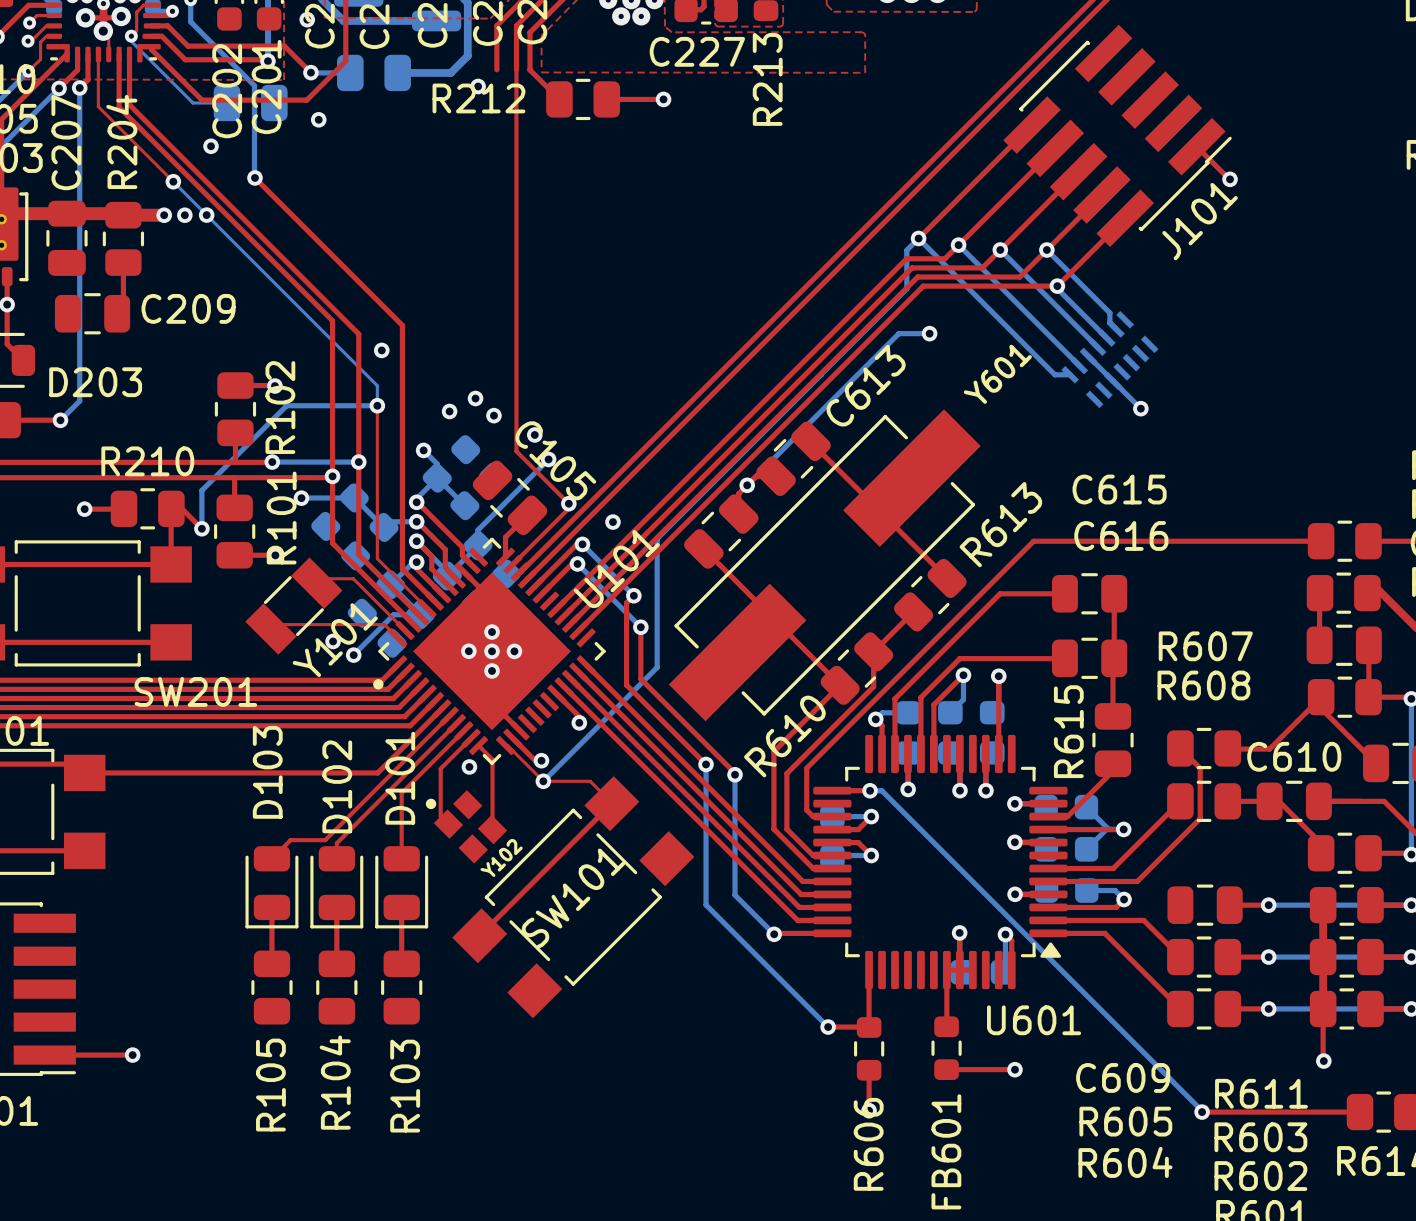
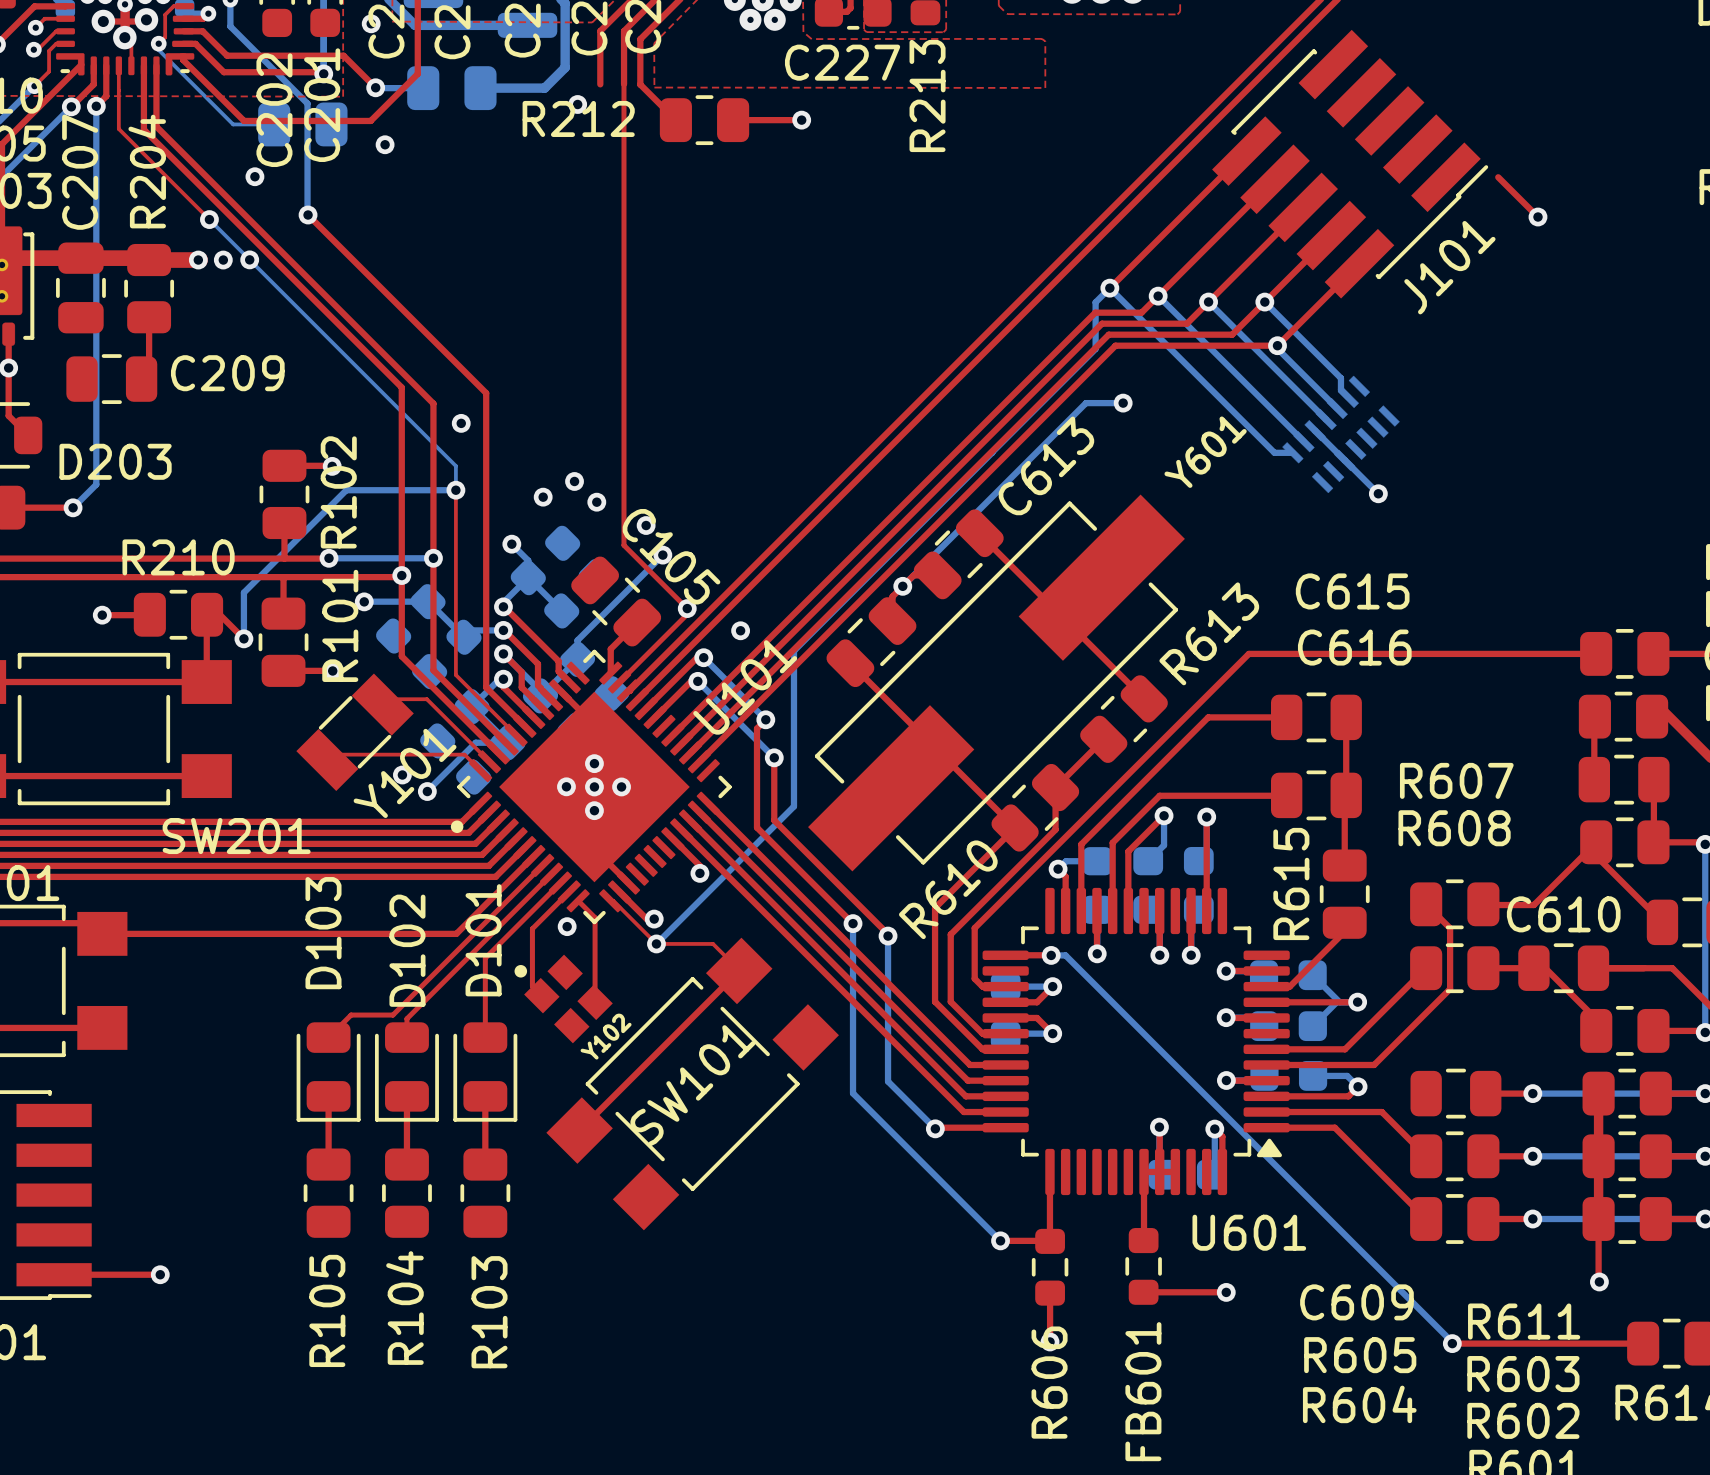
top track: (1196, 146) (1229, 179) (1235, 179) -> none
top track: none -> (1498, 177) (1537, 217)
via position: (1230, 179) -> (1537, 217)

